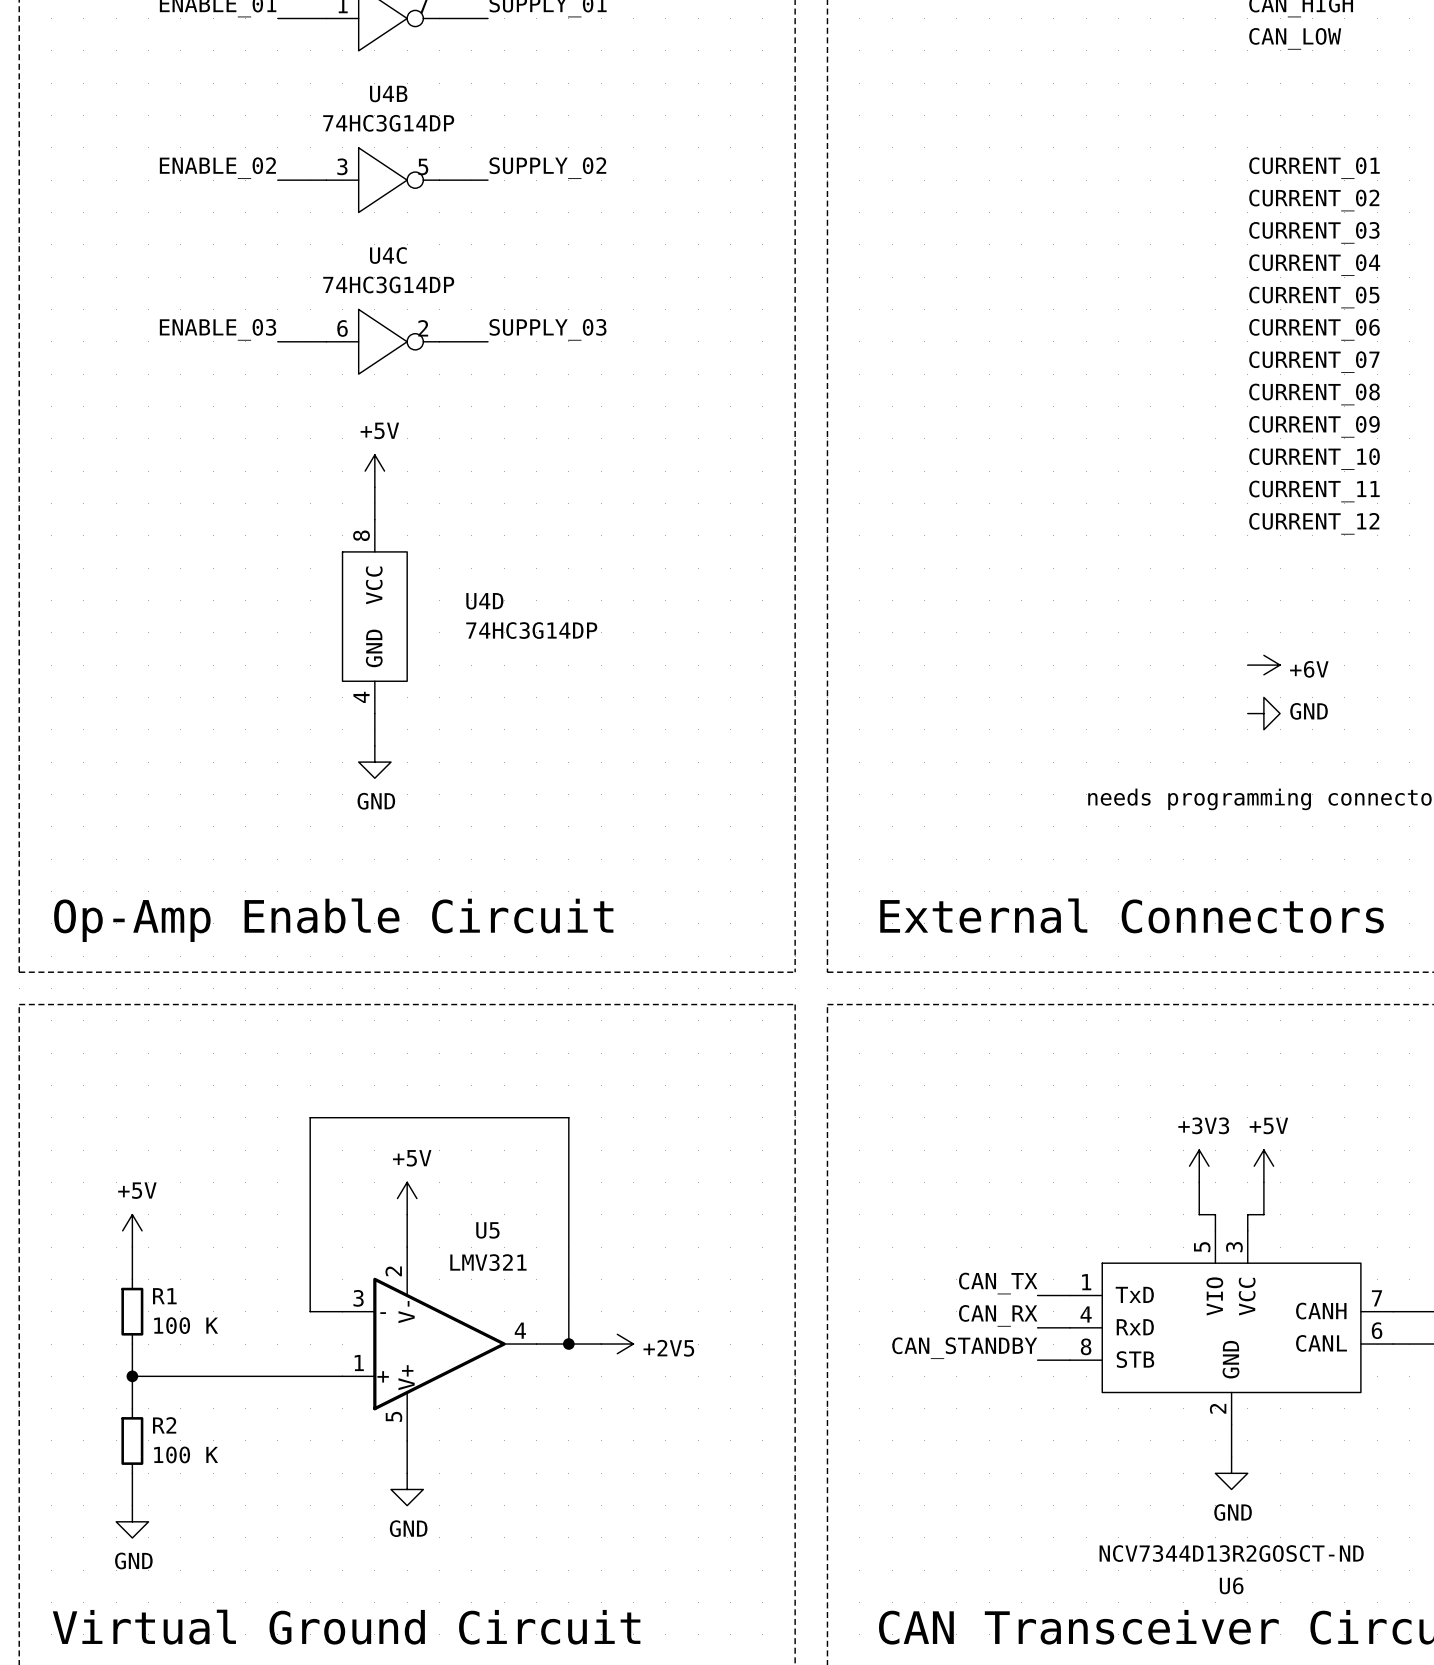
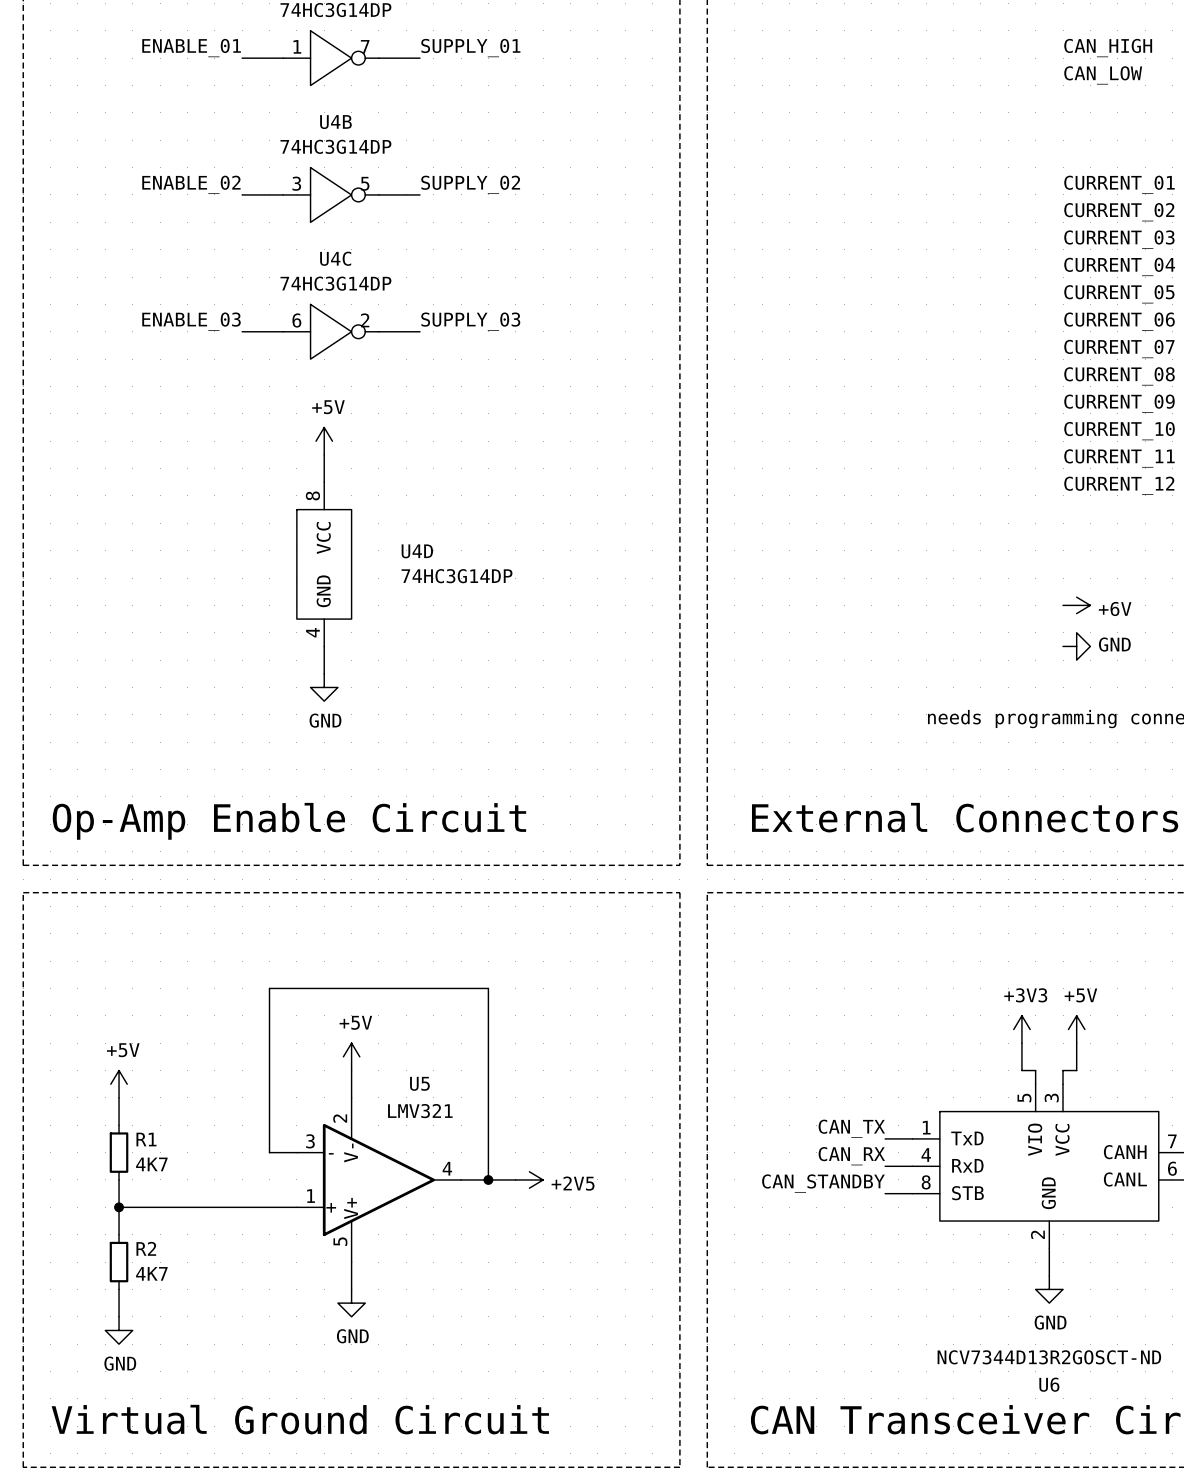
R1 value: 100 K (186, 1325) -> 4K7 (151, 1164)
R2 value: 100 K (186, 1454) -> 4K7 (151, 1273)

